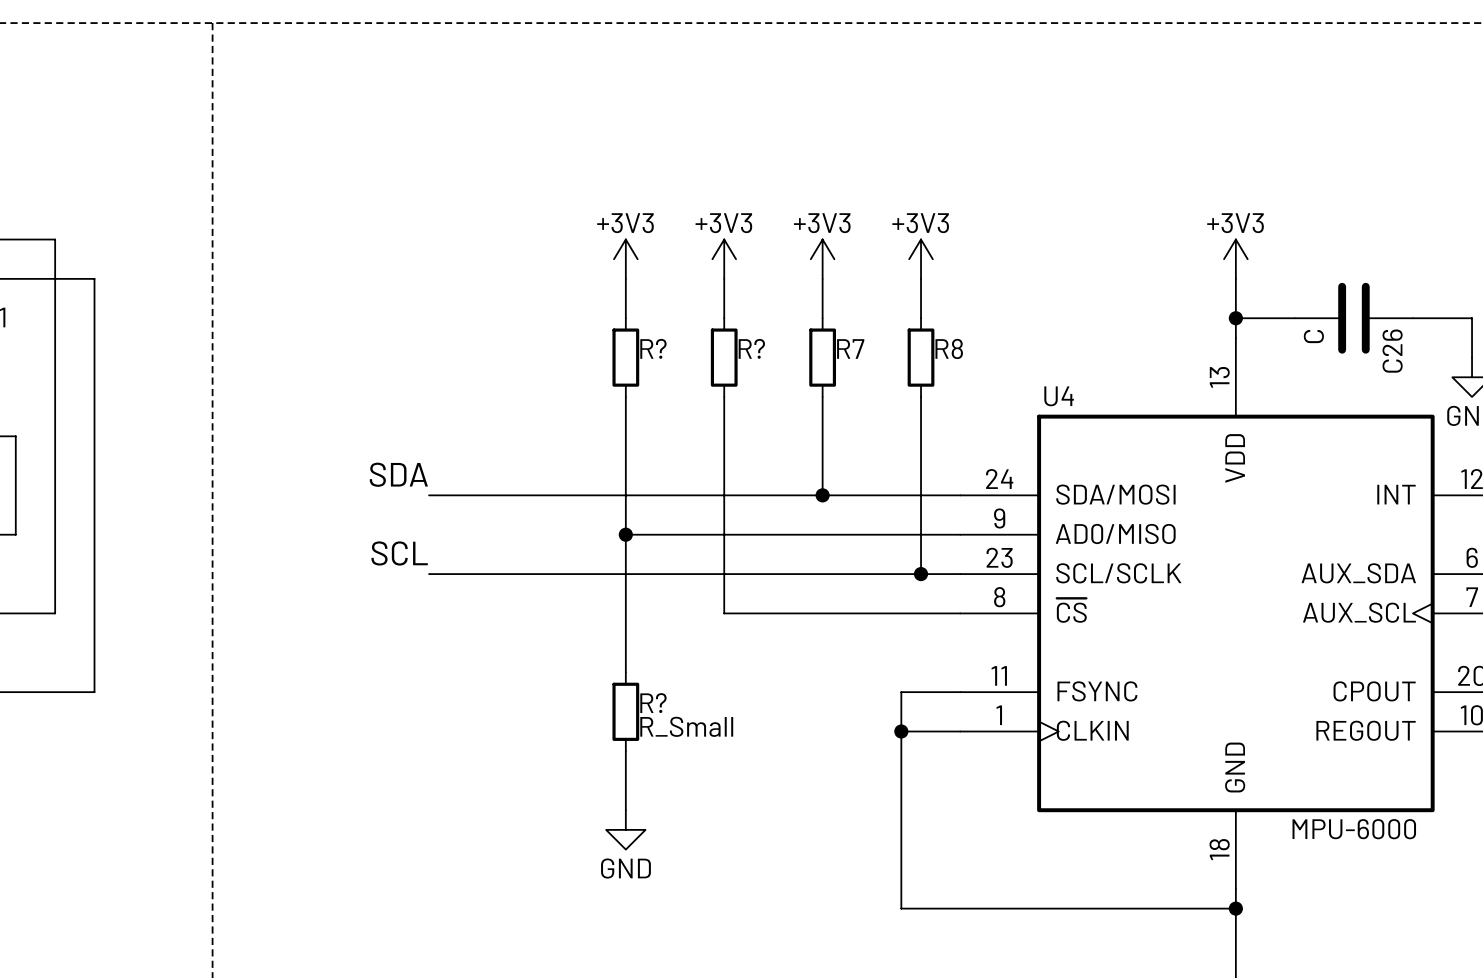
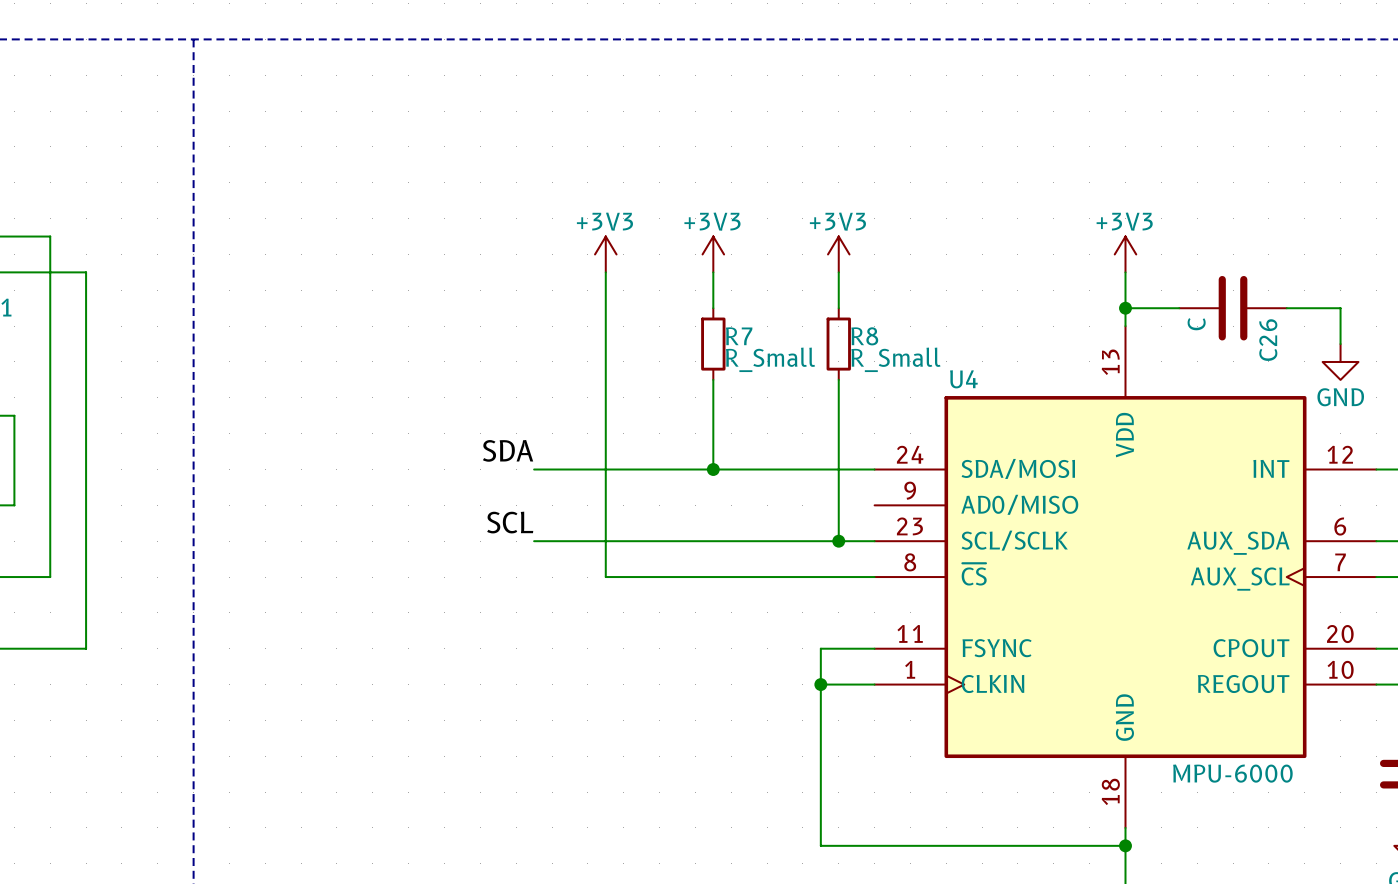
power symbol: +3V3 (625, 259) -> none
power symbol: none -> +3V3 (605, 254)
power symbol: +3V3 (724, 259) -> none
power symbol: none -> +3V3 (713, 254)
power symbol: +3V3 (822, 259) -> none
wire: (625, 278) (625, 318) -> none
wire: (724, 278) (724, 318) -> none
wire: (822, 278) (822, 318) -> (713, 272) (713, 308)
R?: (625, 357) -> none
R?: (724, 357) -> none
R7 position: (822, 357) -> (713, 344)
R7 value: none -> R_Small (770, 359)
R8 value: none -> R_Small (895, 359)
wire: (625, 396) (625, 672) -> none
wire: (724, 396) (724, 613) -> (605, 272) (605, 577) (659, 577)
wire: (822, 396) (822, 495) -> (713, 379) (713, 469)
label position: SDA (398, 474) -> SDA (508, 450)
wire: (429, 495) (586, 495) -> none
junction position: (822, 495) -> (713, 469)
wire: (625, 534) (960, 534) -> none
junction: (625, 534) -> none
label position: SCL (399, 553) -> SCL (510, 522)
wire: (429, 574) (586, 574) -> none
R?: R_Small (625, 711) -> none
wire: (625, 751) (625, 810) -> none
power symbol: GND (625, 829) -> none

